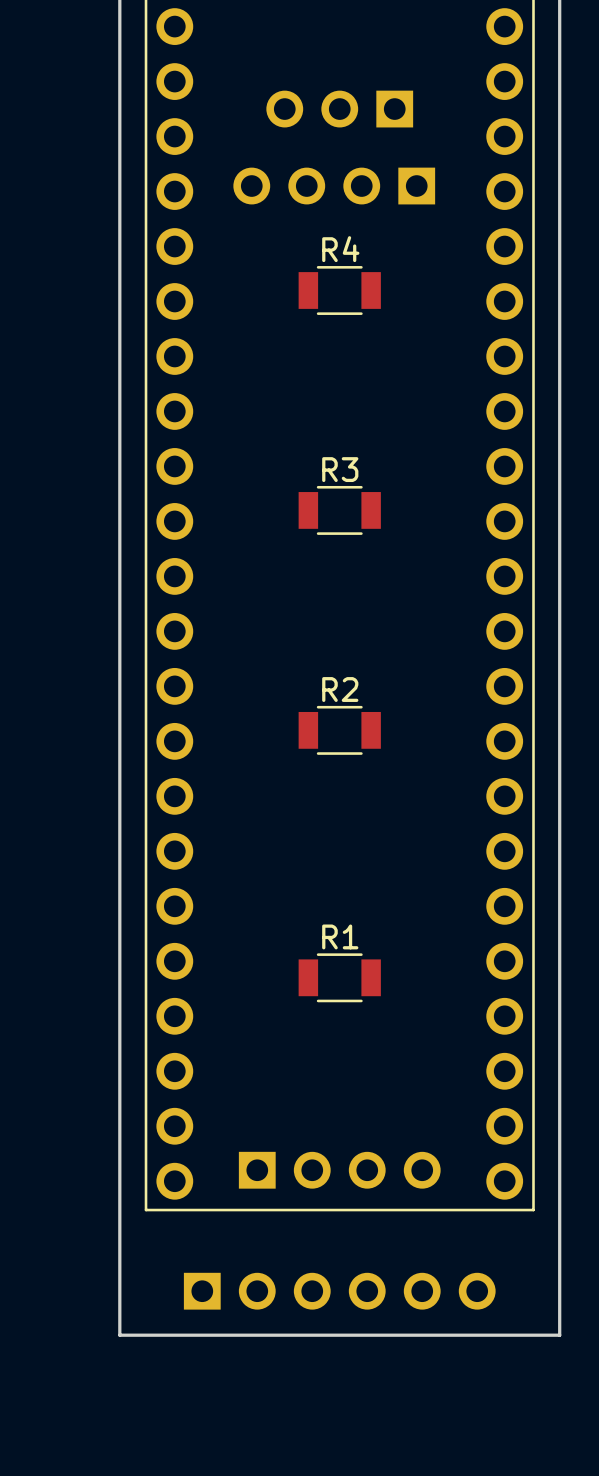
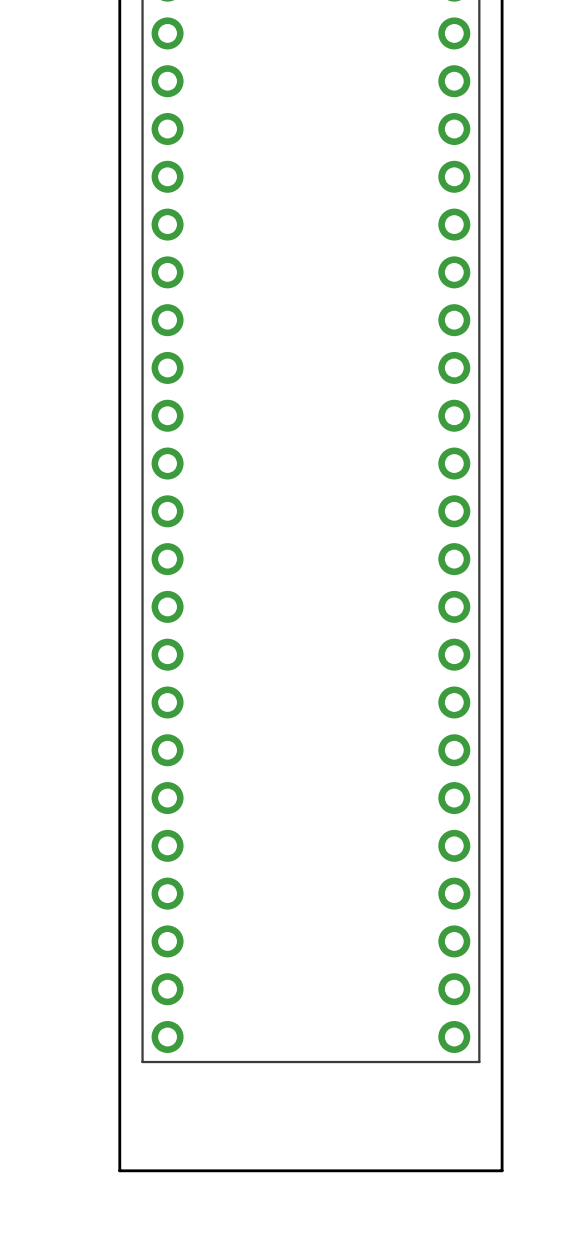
part: (339, 109) -> none
part: (334, 186) -> none
R4: (339, 290) -> none
R3: (339, 510) -> none
R2: (339, 730) -> none
R1: (339, 977) -> none
part: (339, 1170) -> none
part: (339, 1291) -> none

